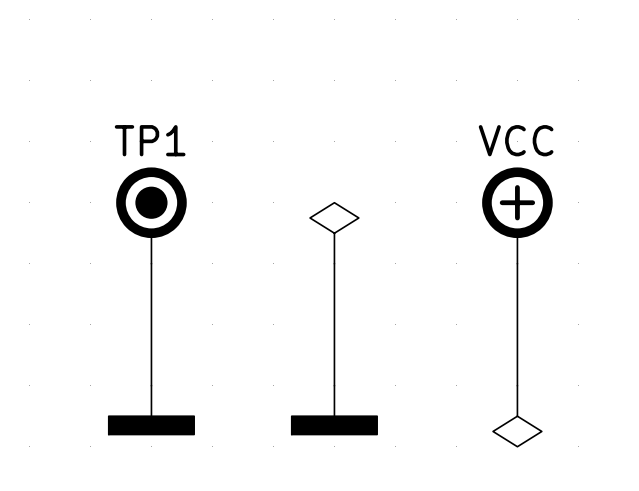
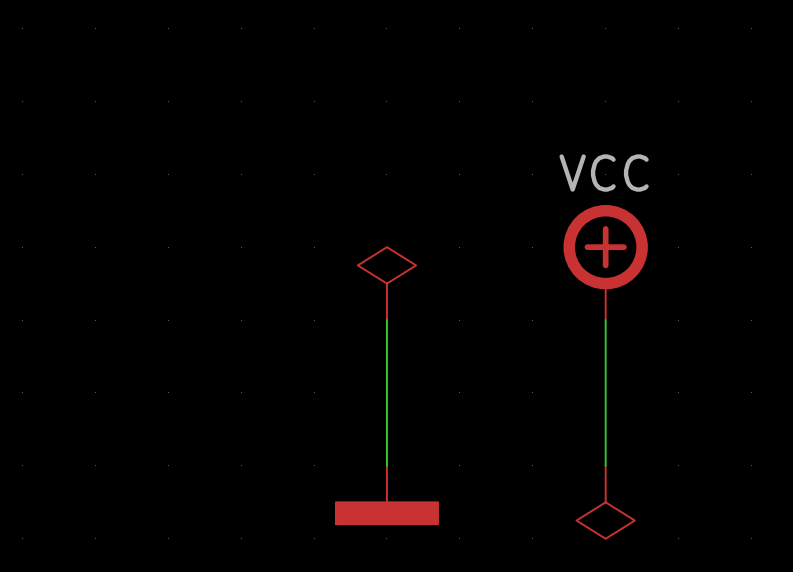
TP1: (151, 215) -> none
wire: (151, 263) (151, 385) -> none
power symbol: (151, 410) -> none

